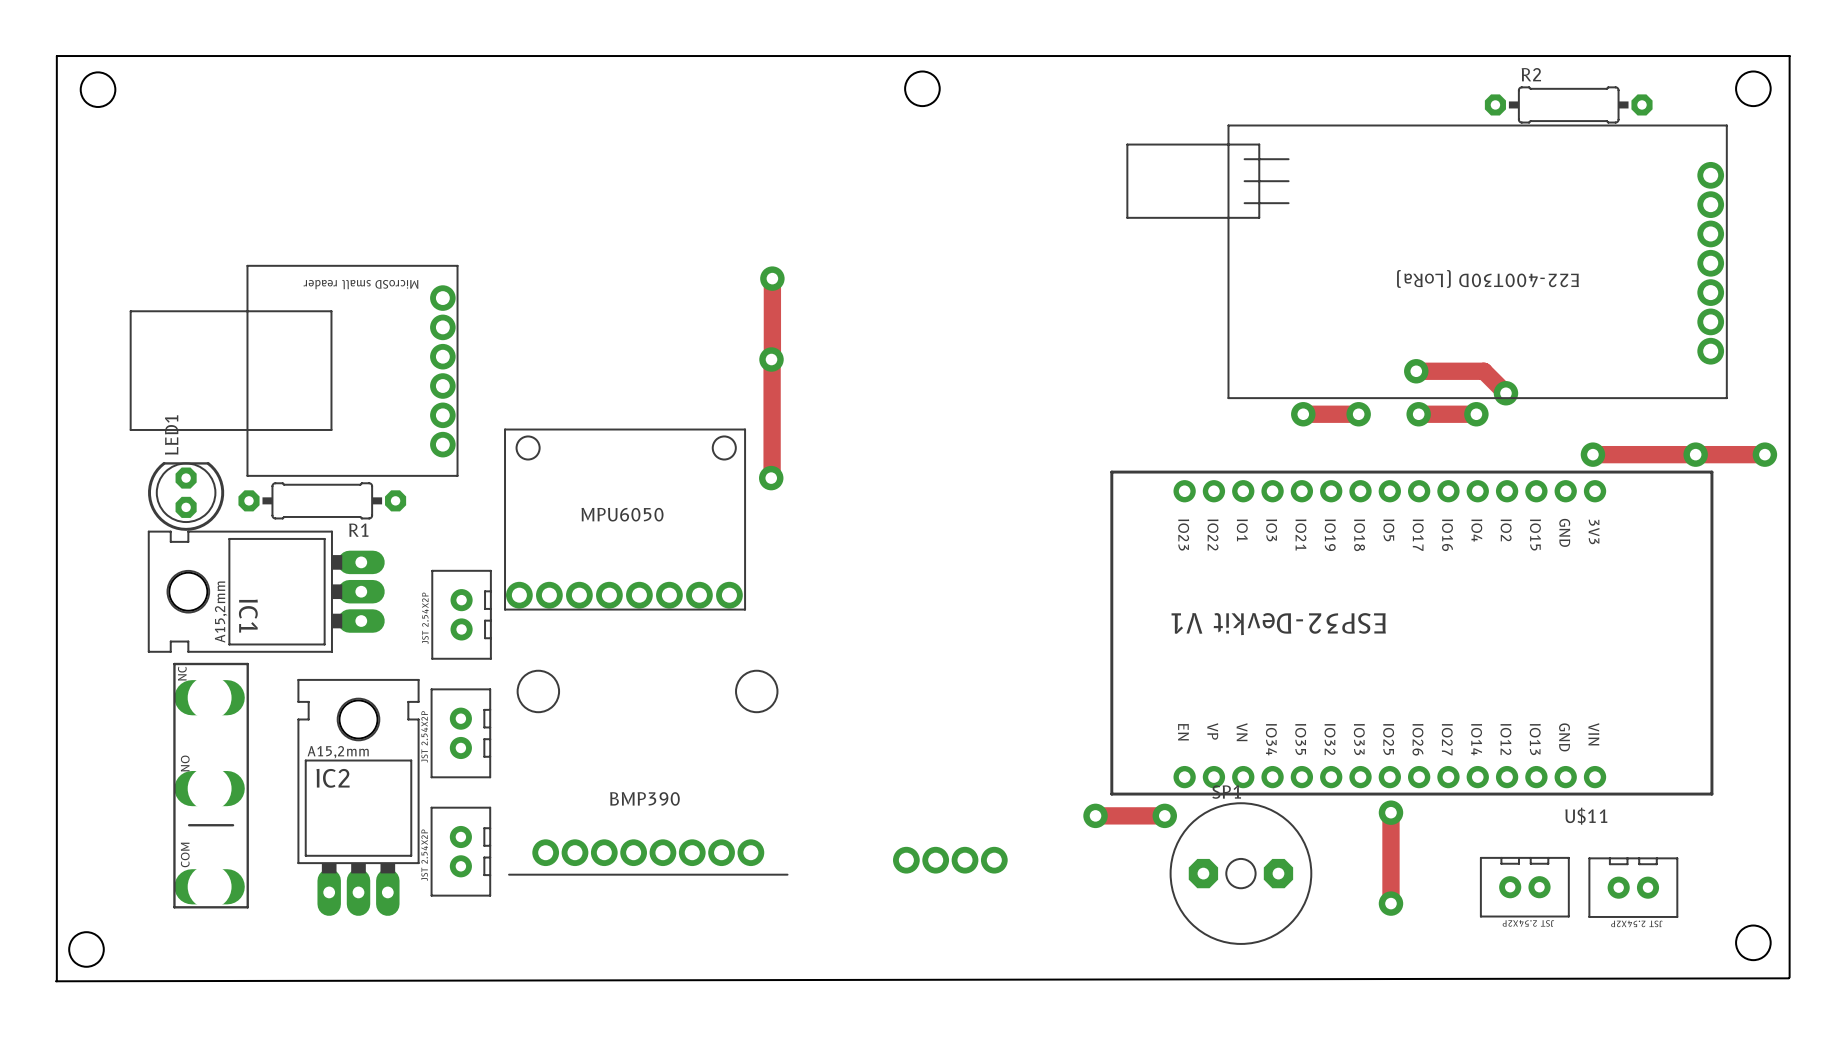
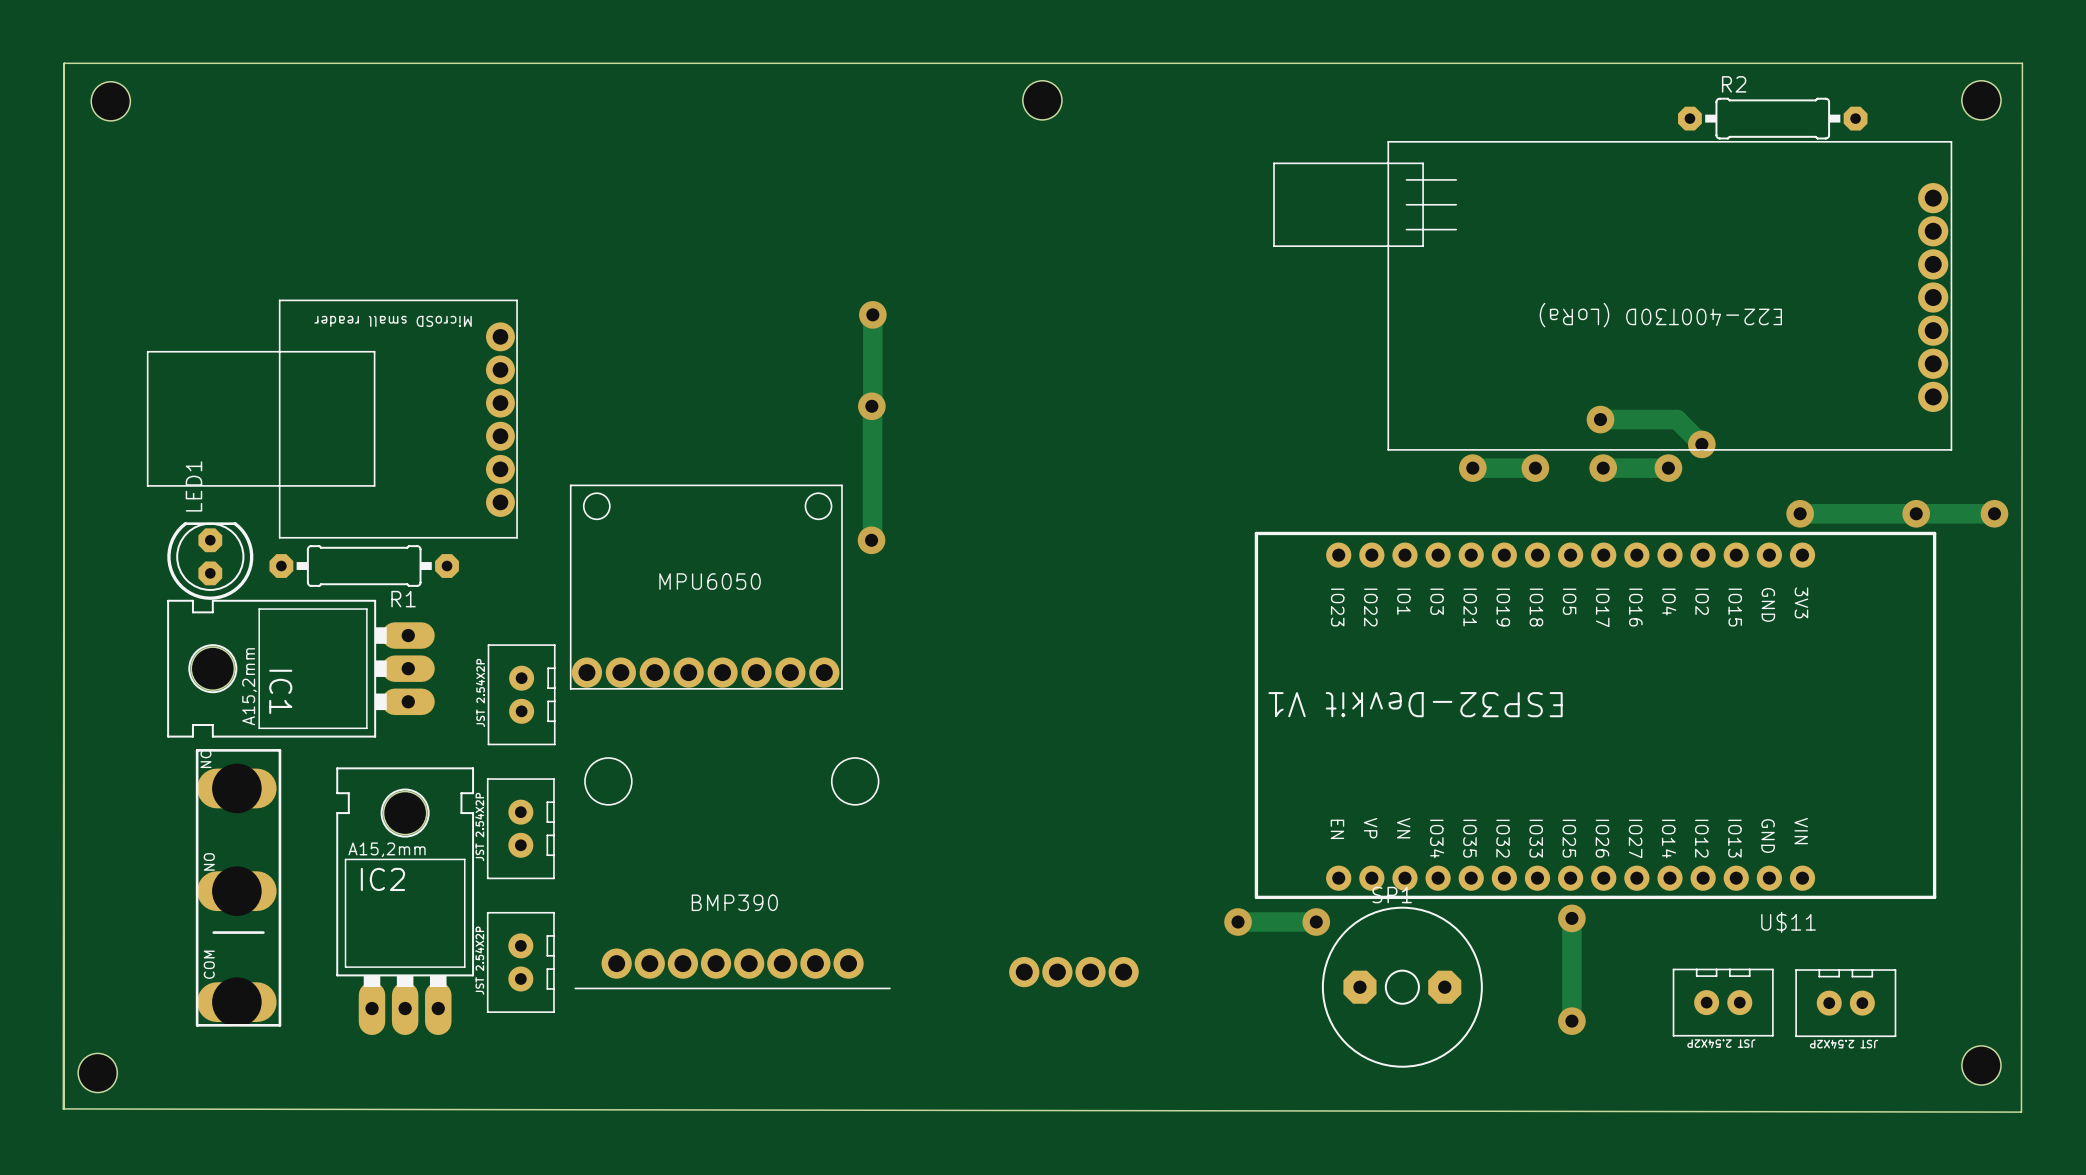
board edge: (1789, 56) (1789, 977) -> (2022, 63) (2021, 1112) (63, 1108) (64, 63)
board edge: (1788, 978) (56, 981) -> none

